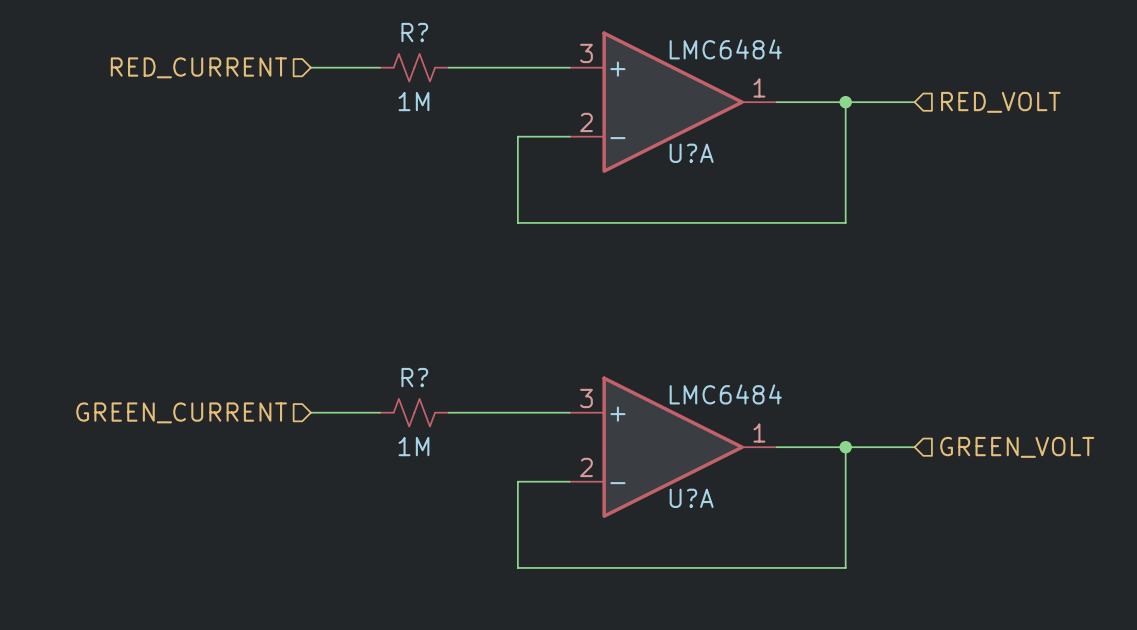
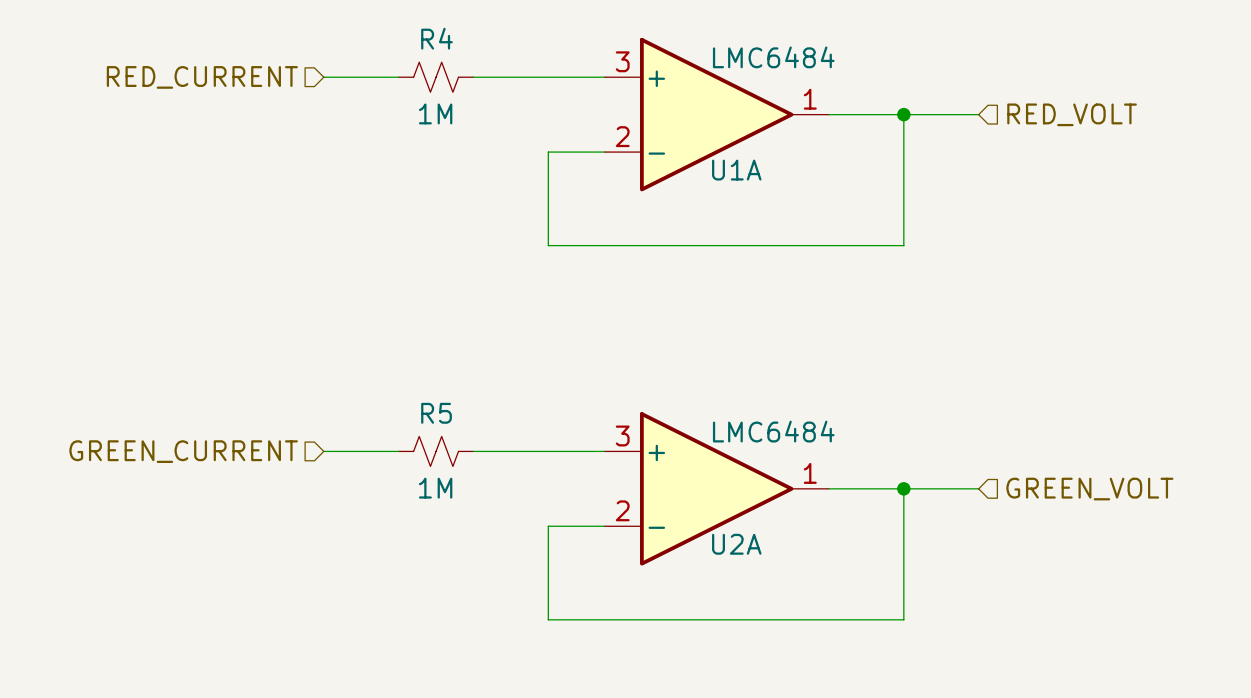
R? name: R? (414, 32) -> R4 (436, 38)
U?A name: U?A (691, 153) -> U1A (736, 170)
R? name: R? (414, 377) -> R5 (436, 413)
U?A name: U?A (691, 498) -> U2A (736, 544)

